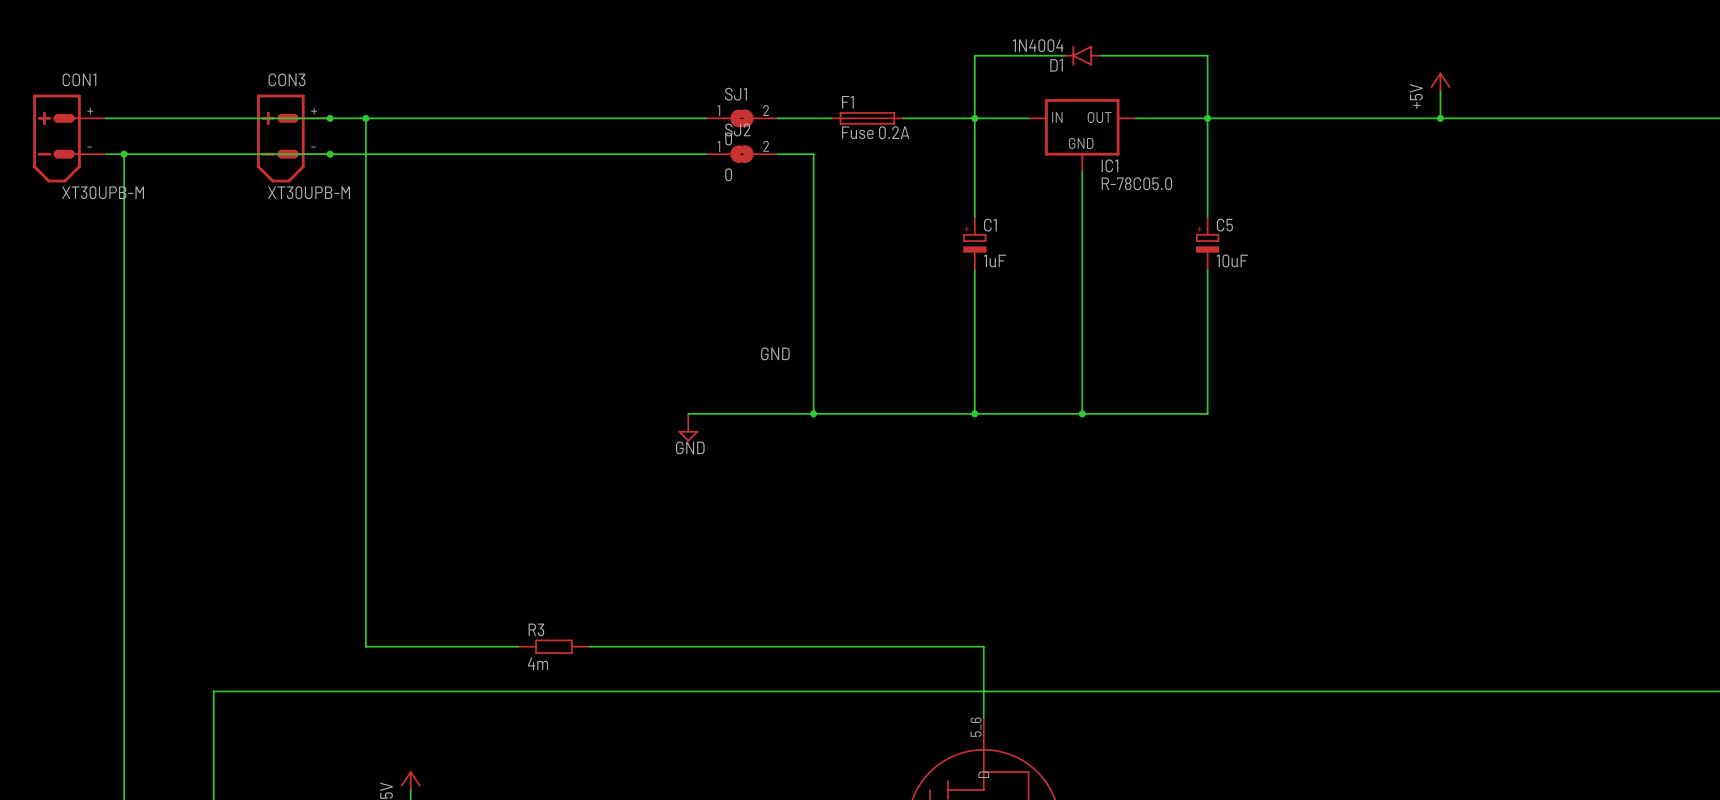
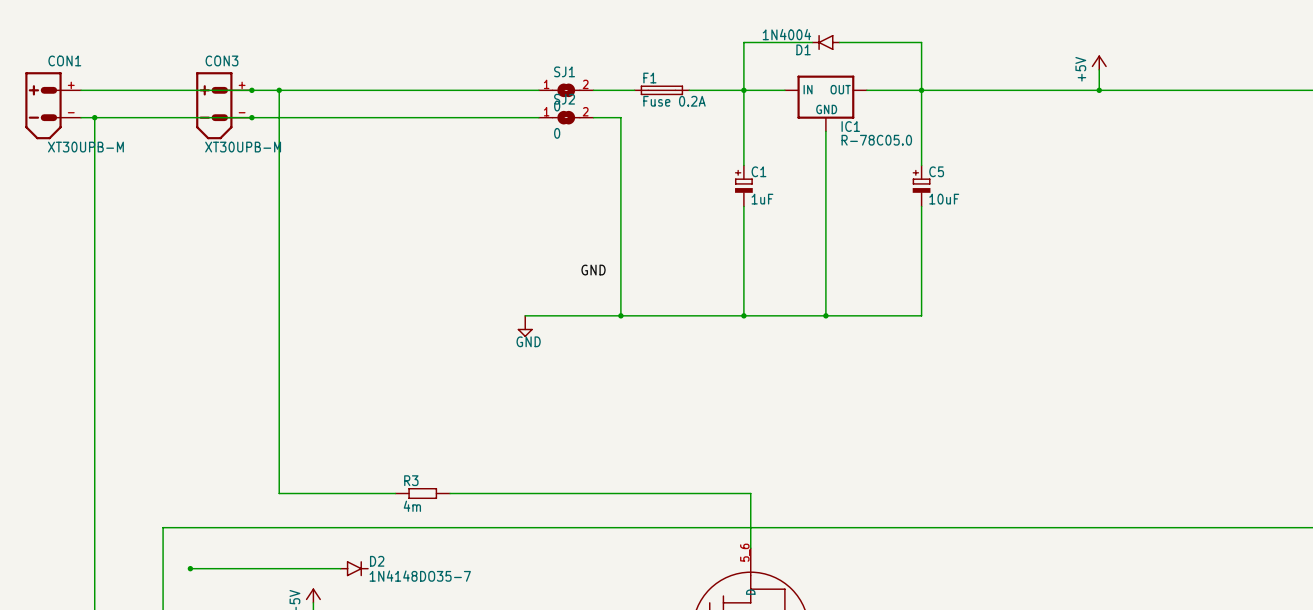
wire: none -> (190, 568) (340, 568)
junction: none -> (190, 568)
D2: none -> 1N4148DO35-7 (354, 568)

